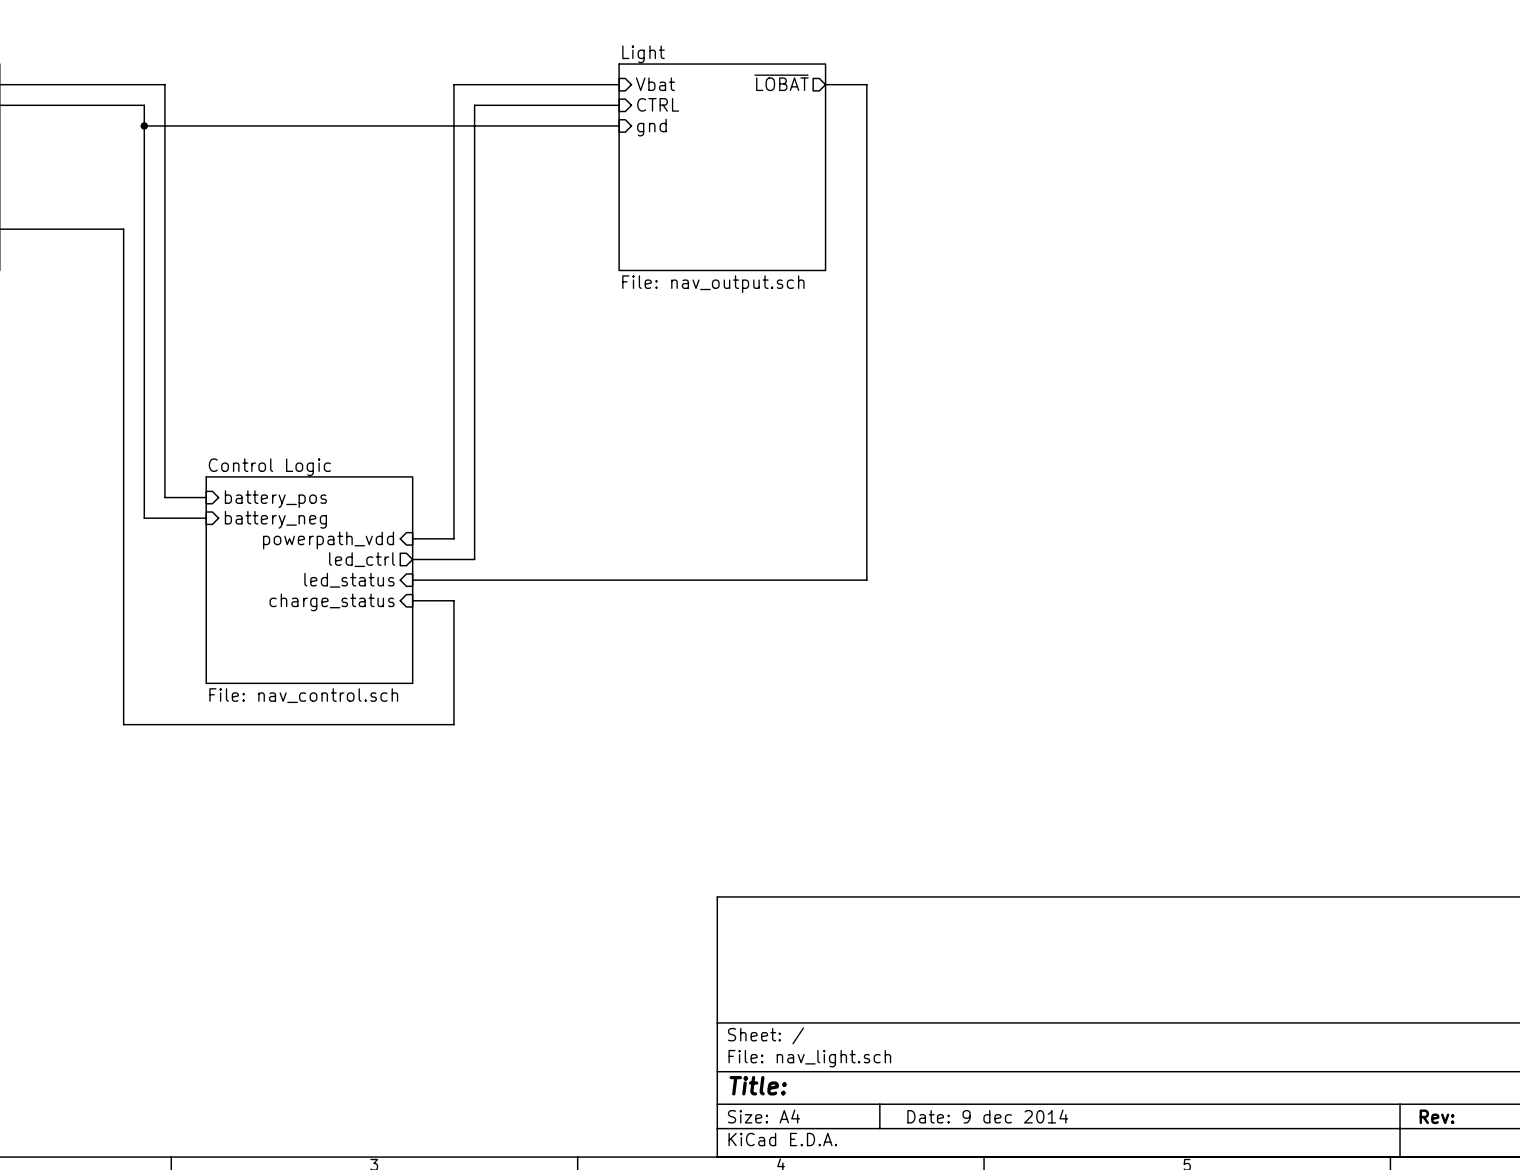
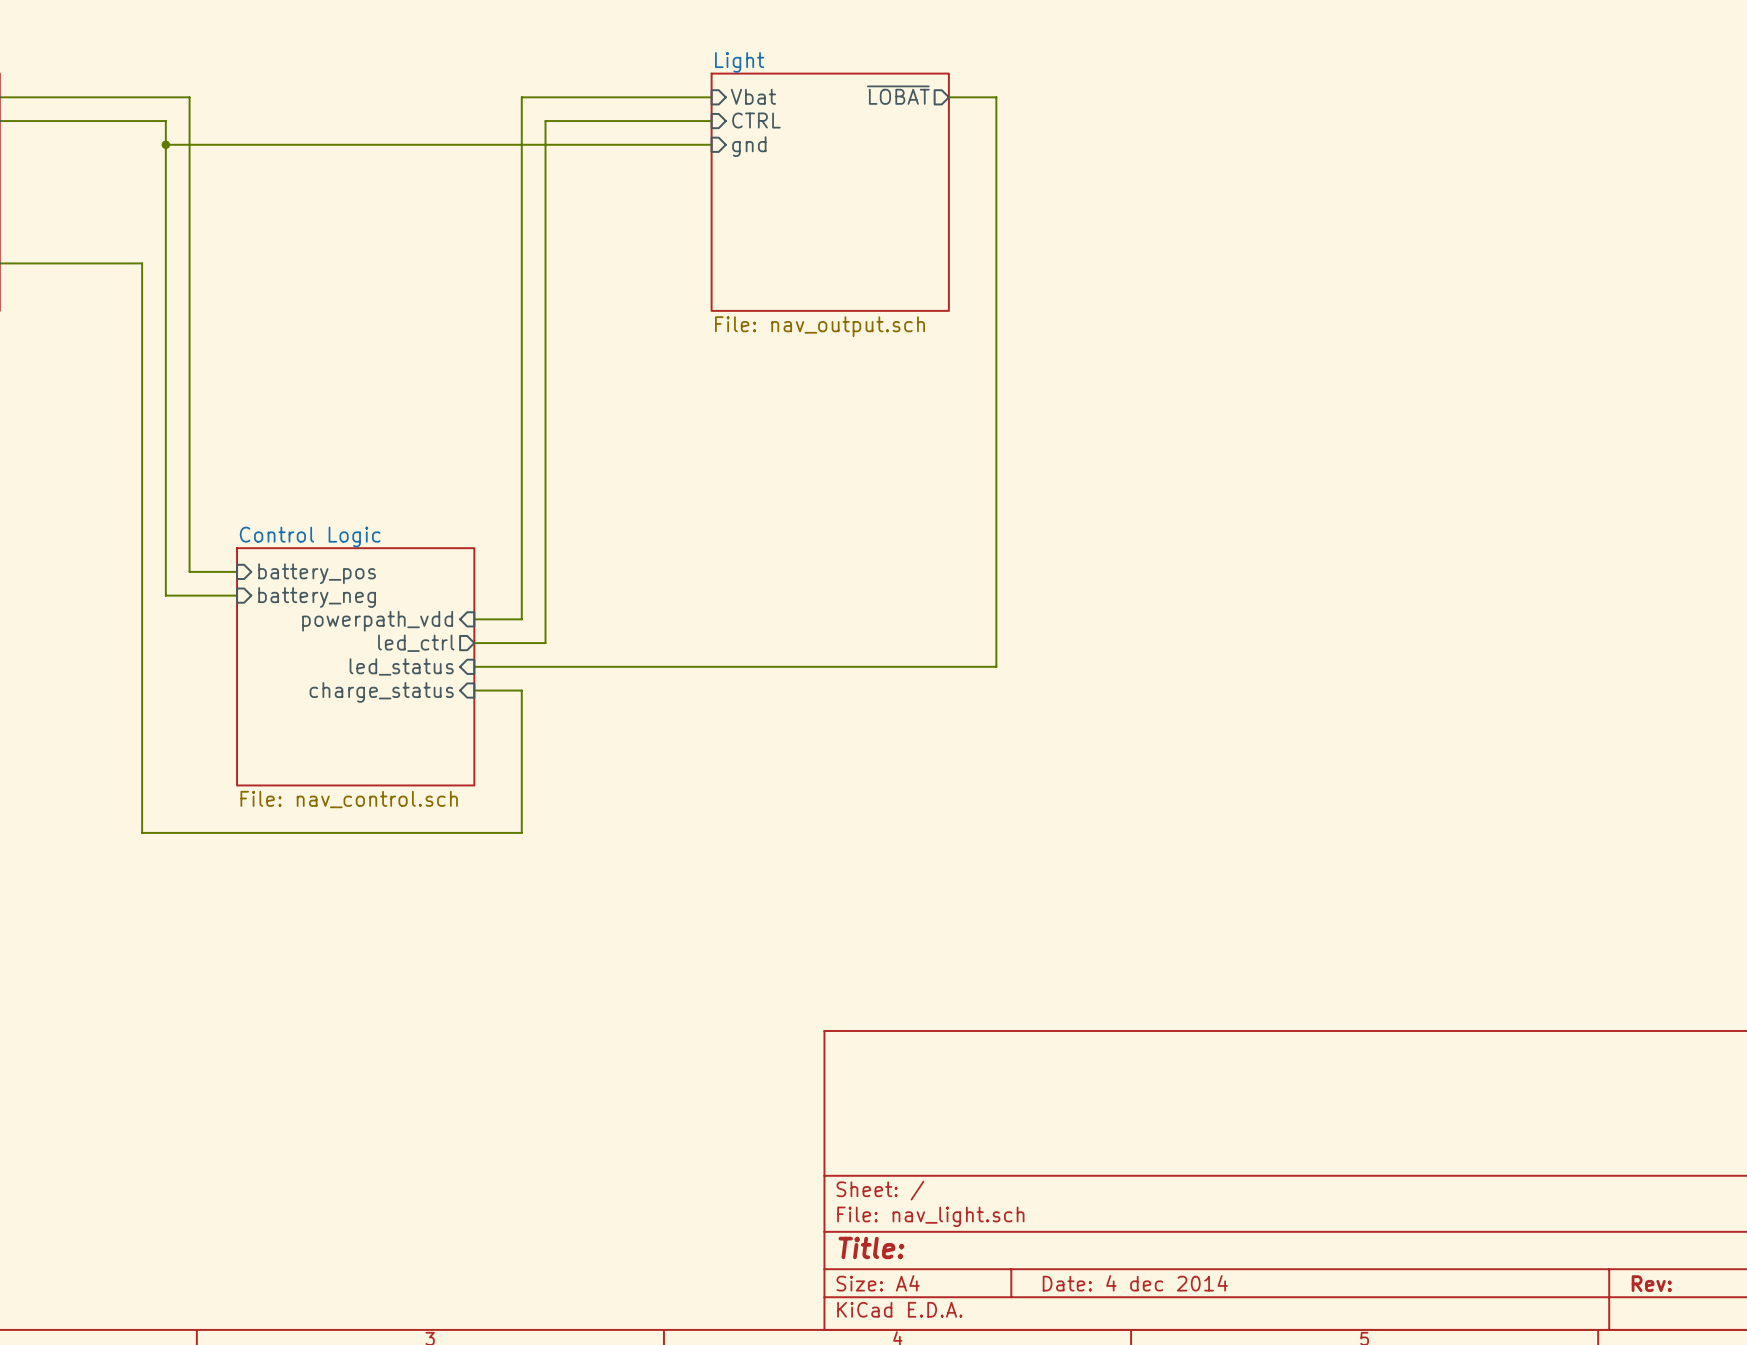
title block: Date: 9 dec 2014 (987, 1116) -> Date: 4 dec 2014 (1135, 1283)

